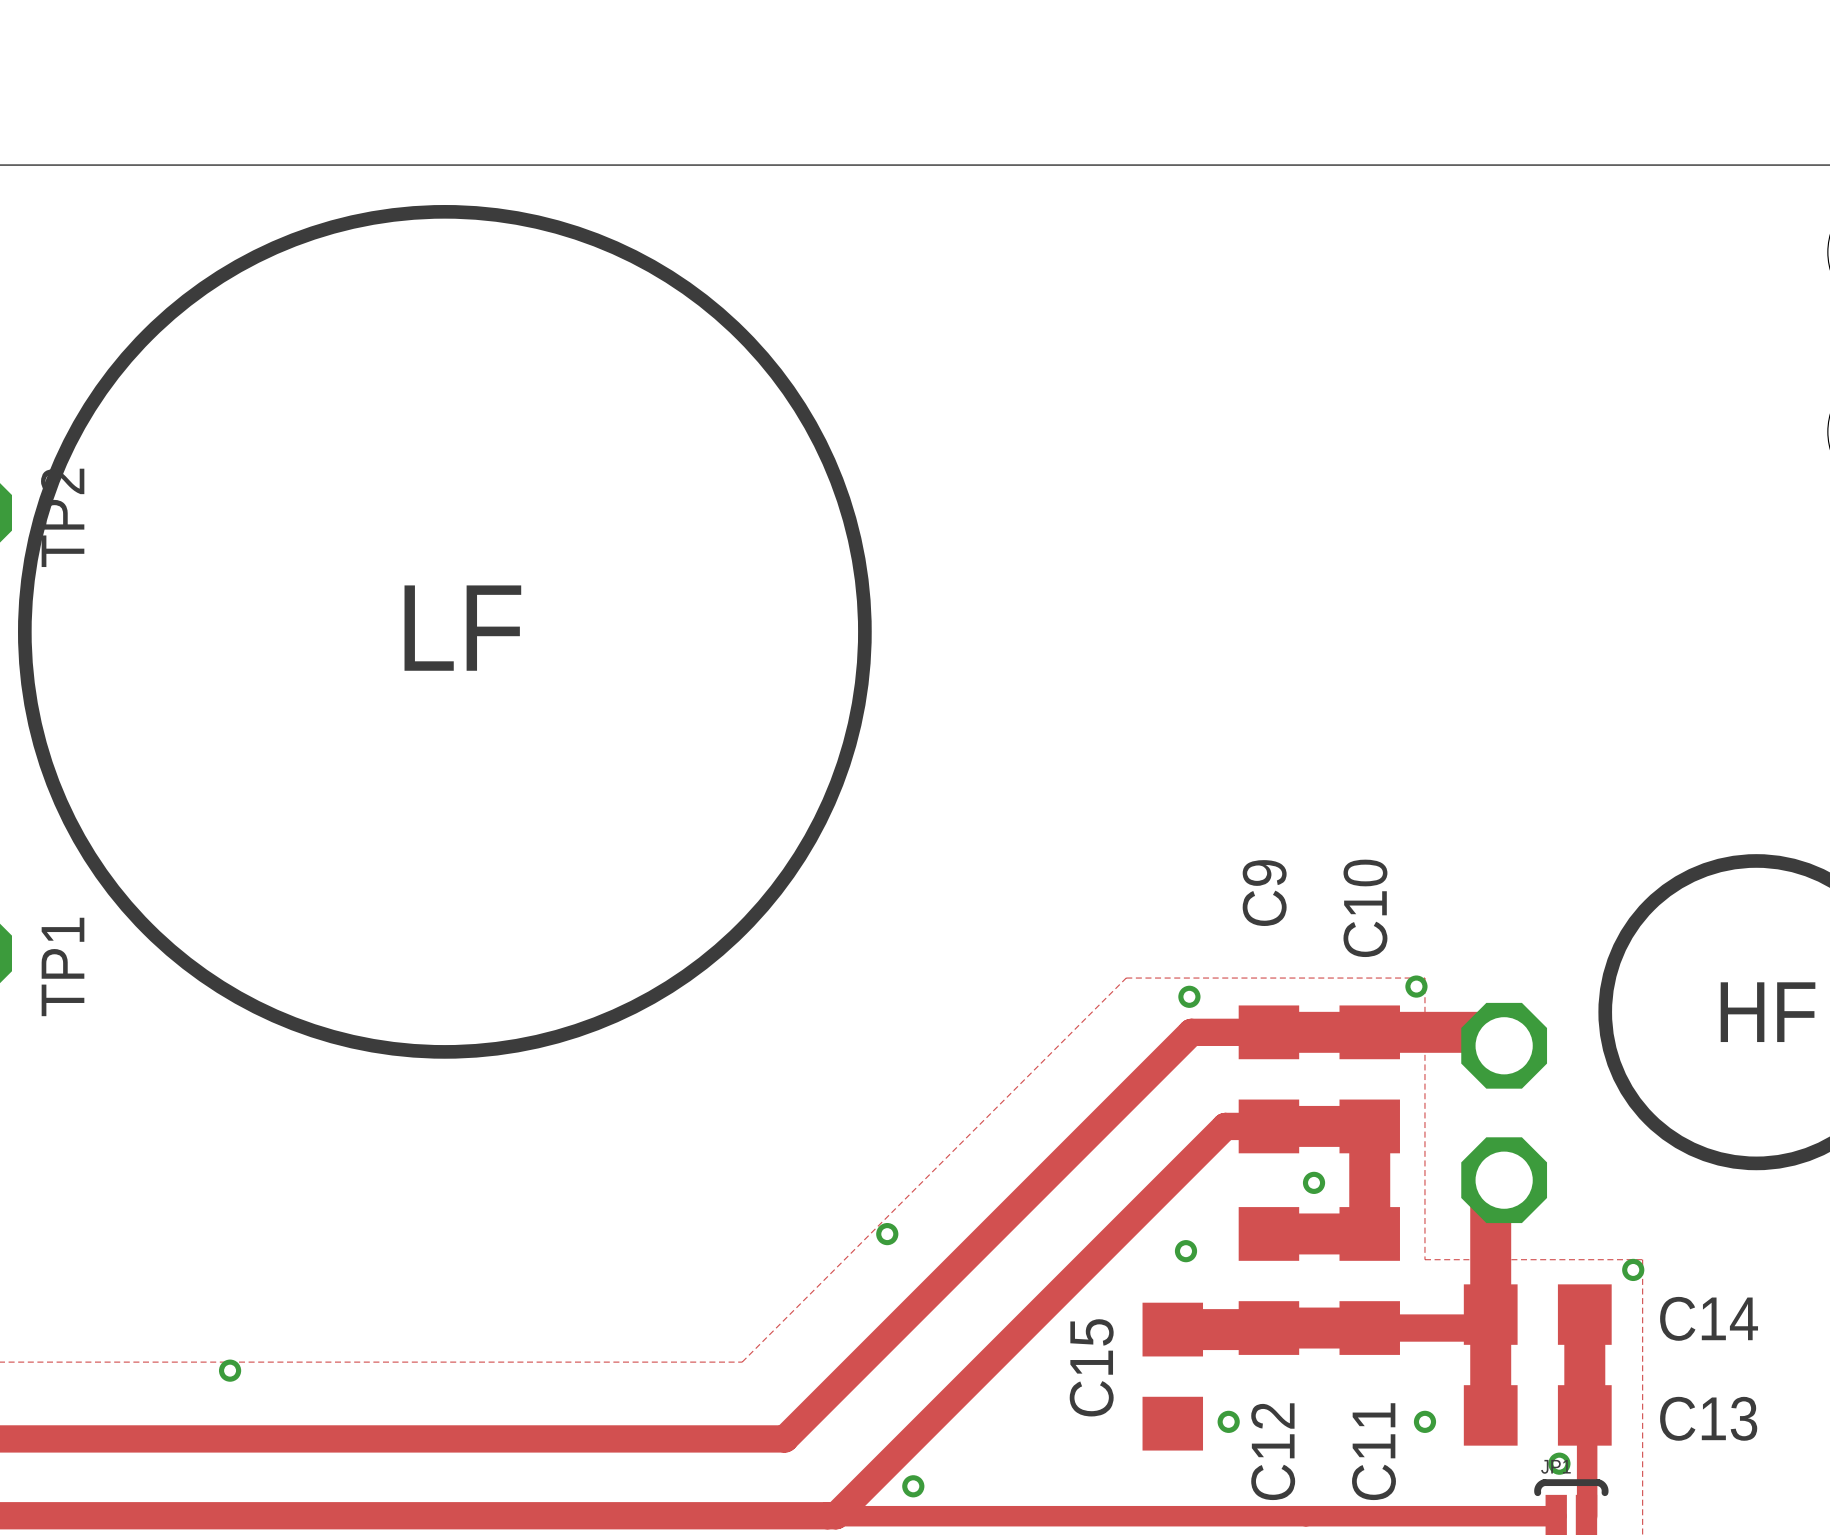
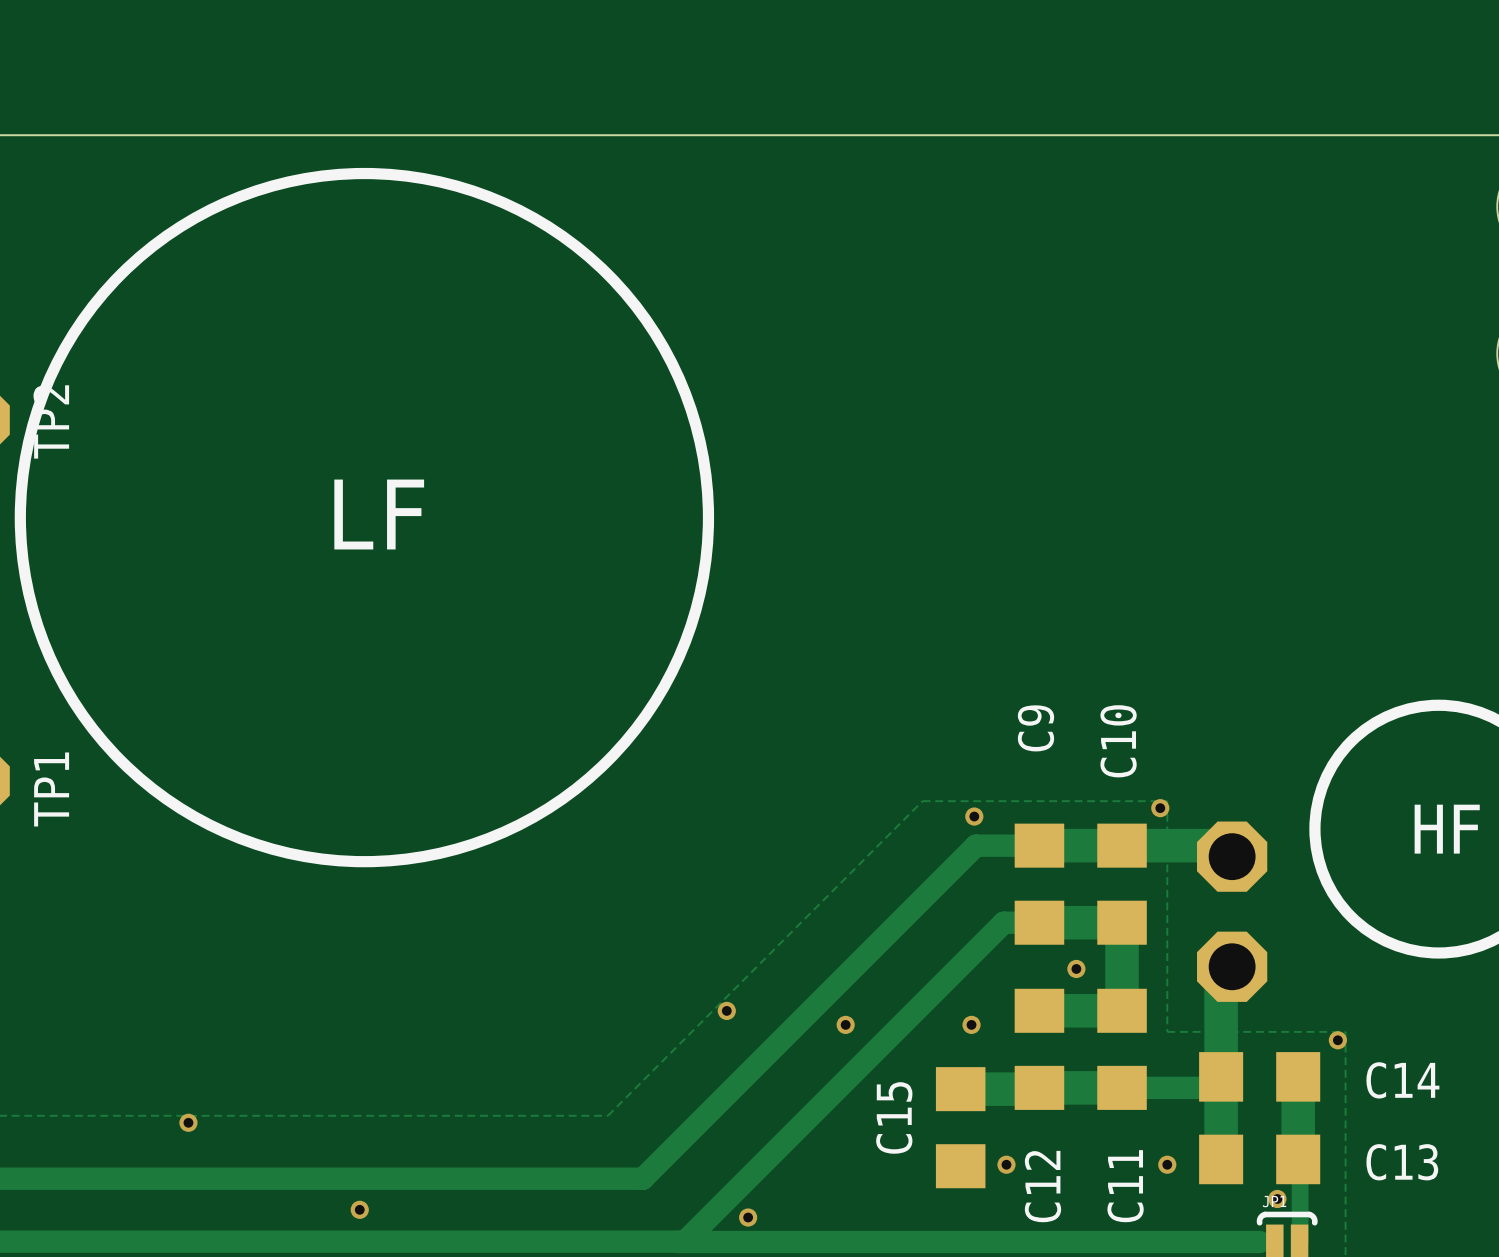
via: none -> (845, 1024)
via: none -> (359, 1209)
track width: thin (827, 1516) (1537, 1516) -> thick (678, 1242) (1259, 1242)

